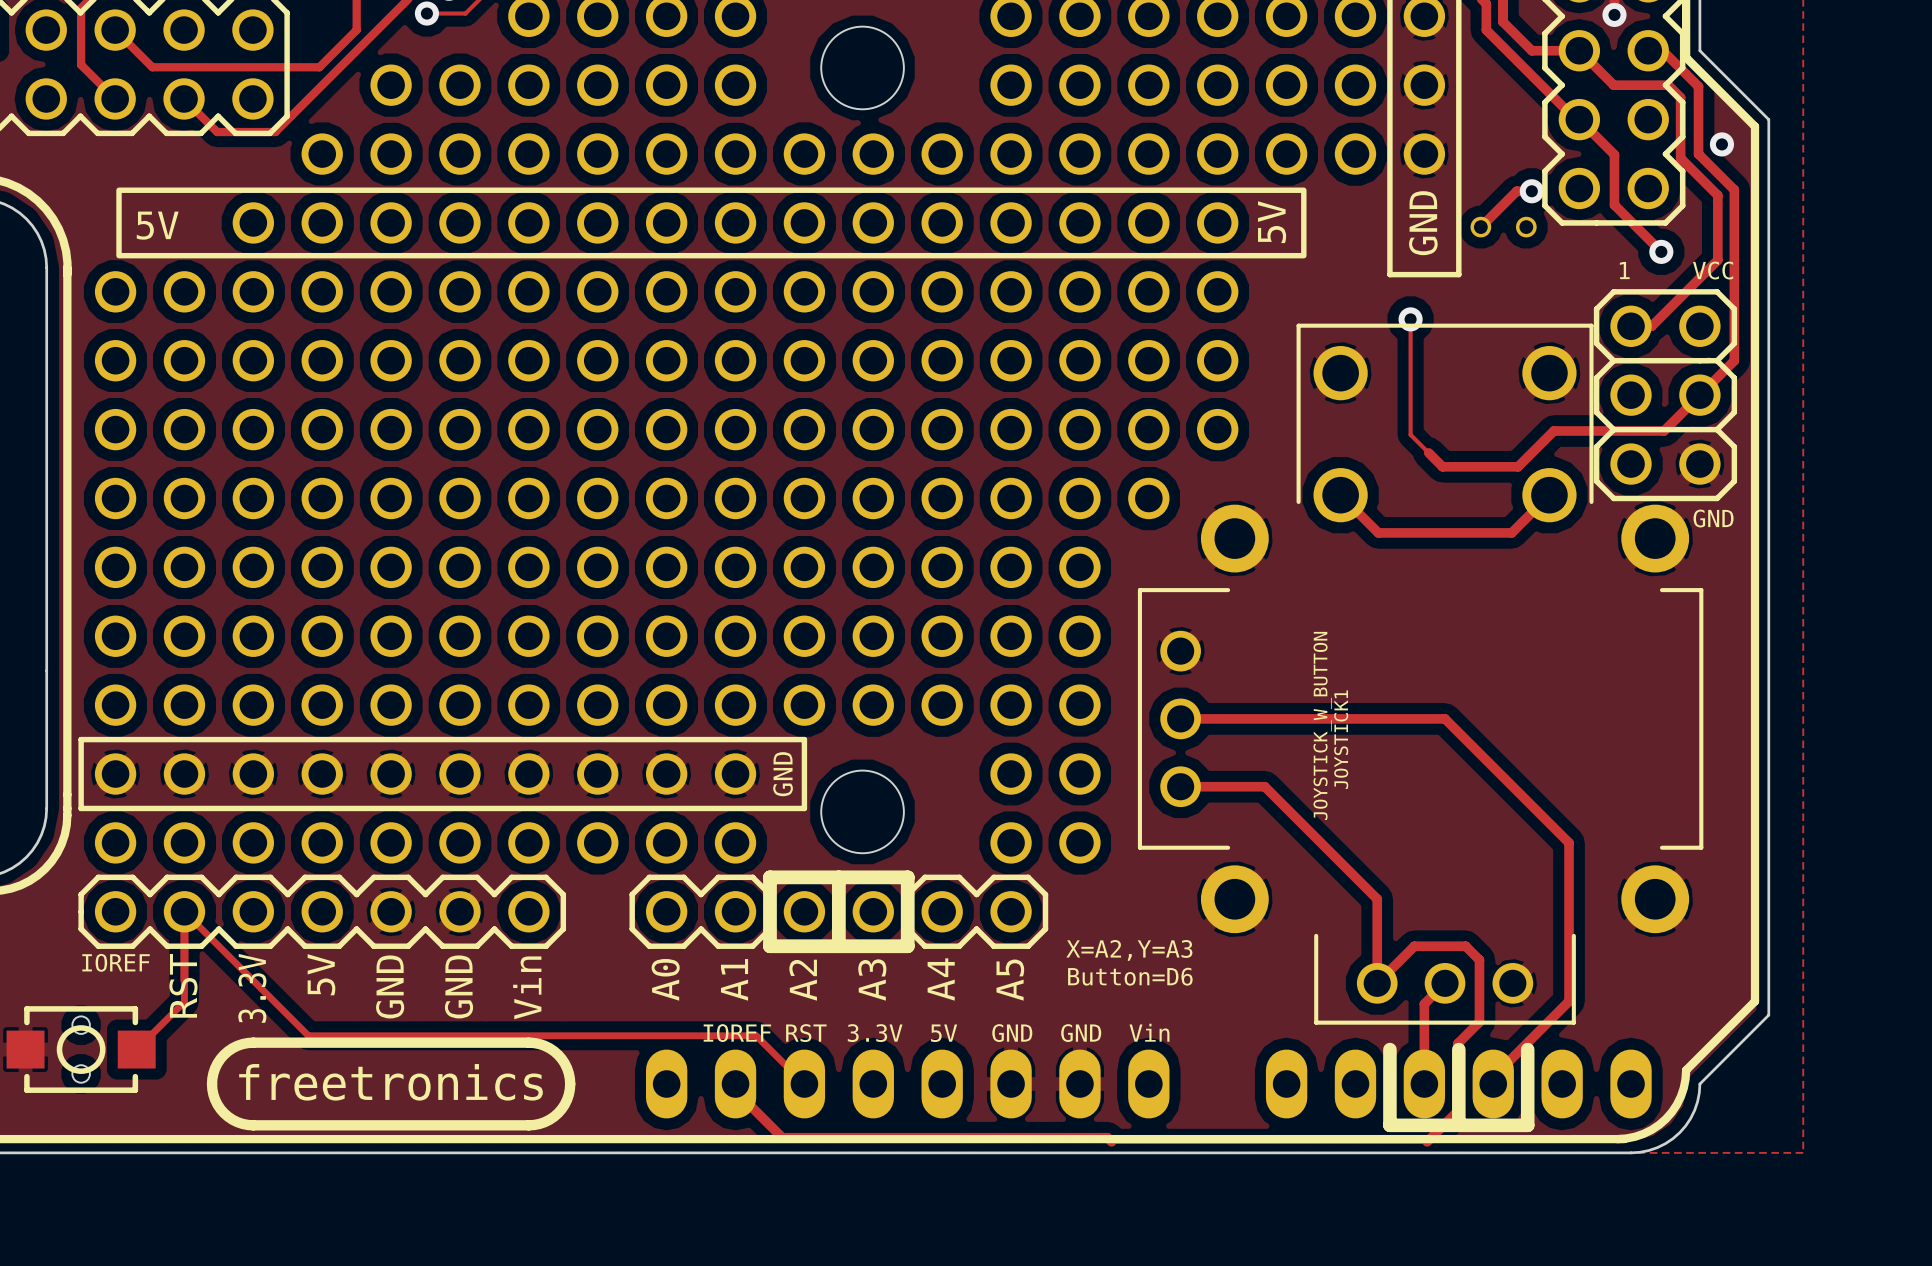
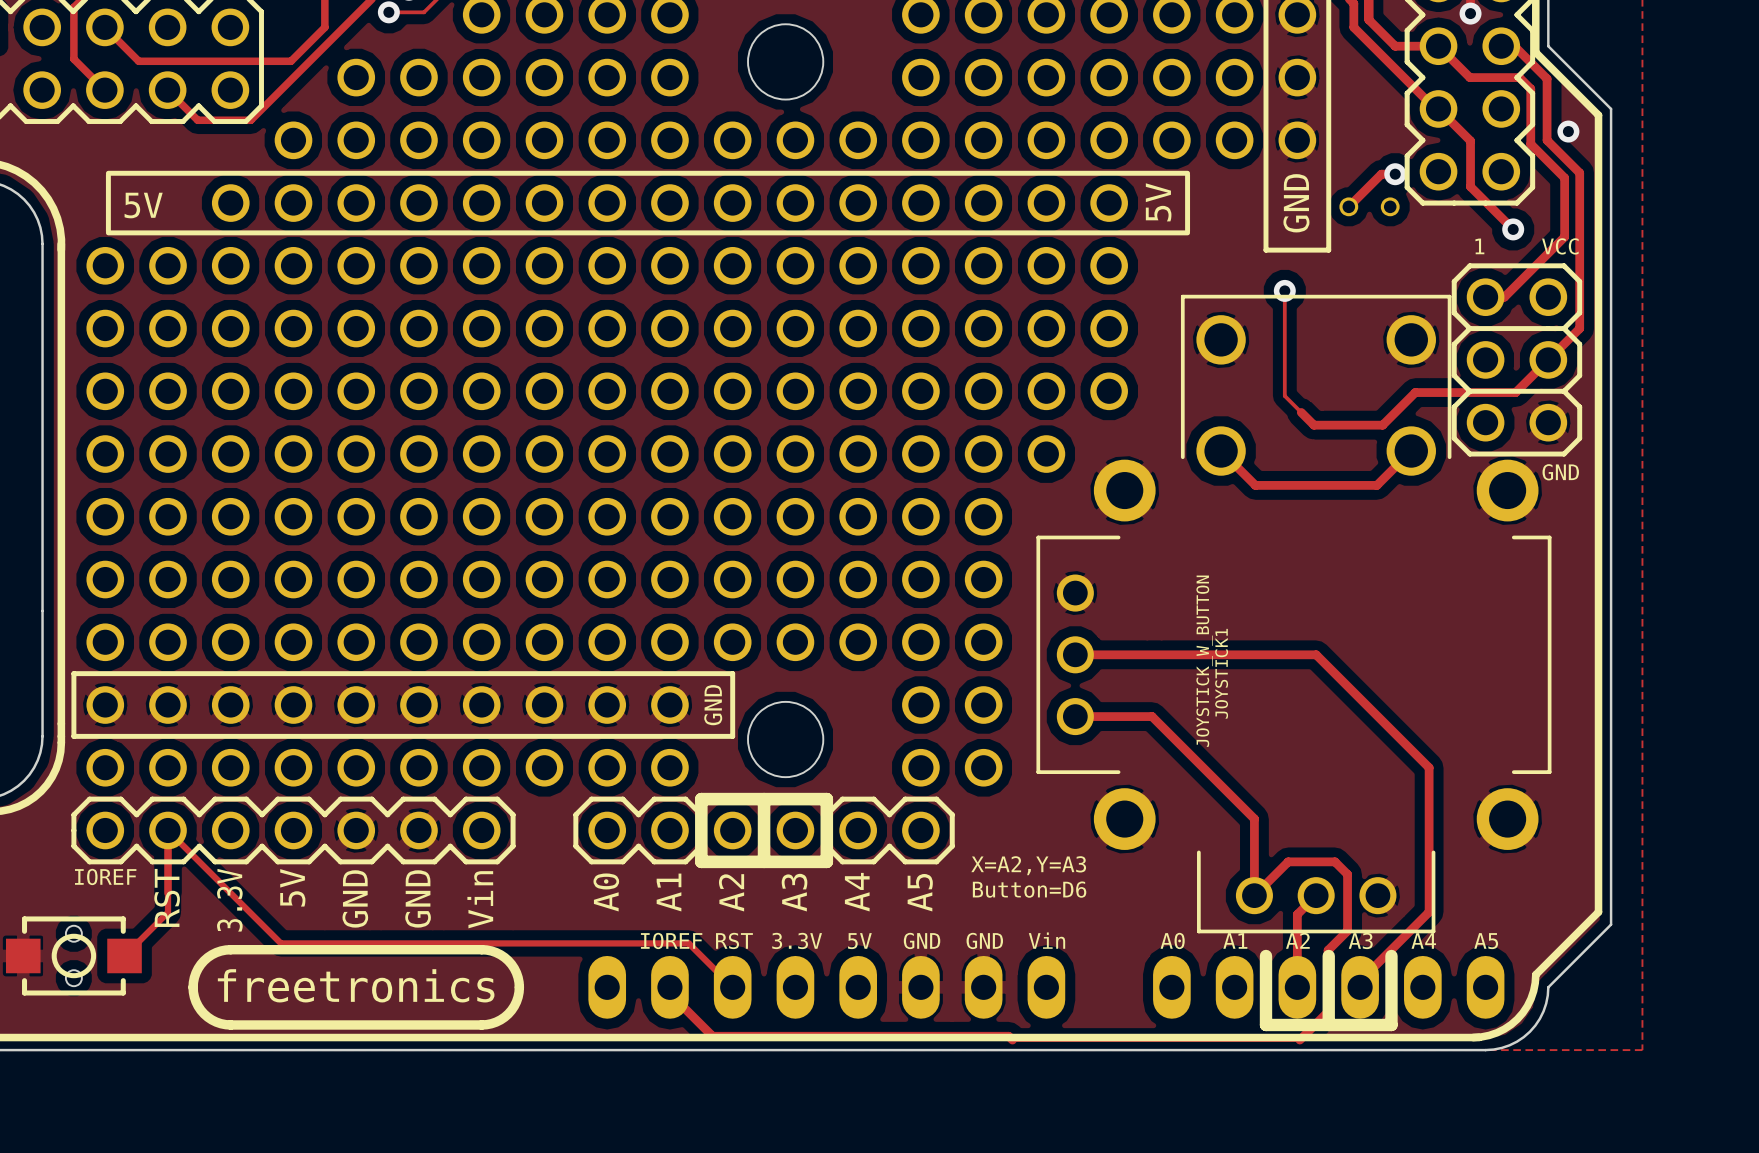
text: none -> A2 (1297, 940)
text: none -> A0 (1172, 940)
text: none -> A1 (1235, 940)
text: none -> A3 (1360, 940)
text: none -> A4 (1423, 940)
text: none -> A5 (1486, 941)

